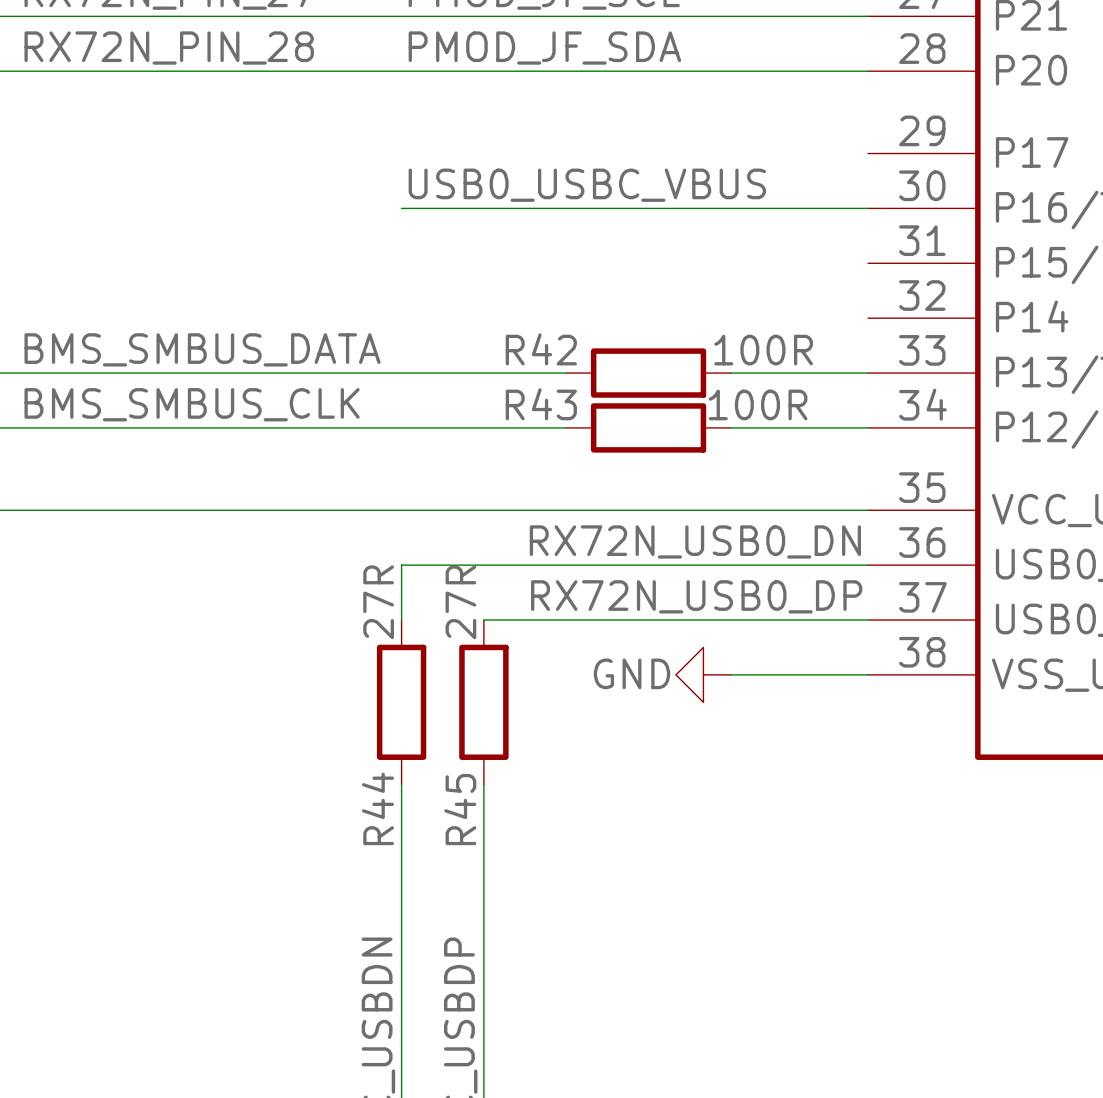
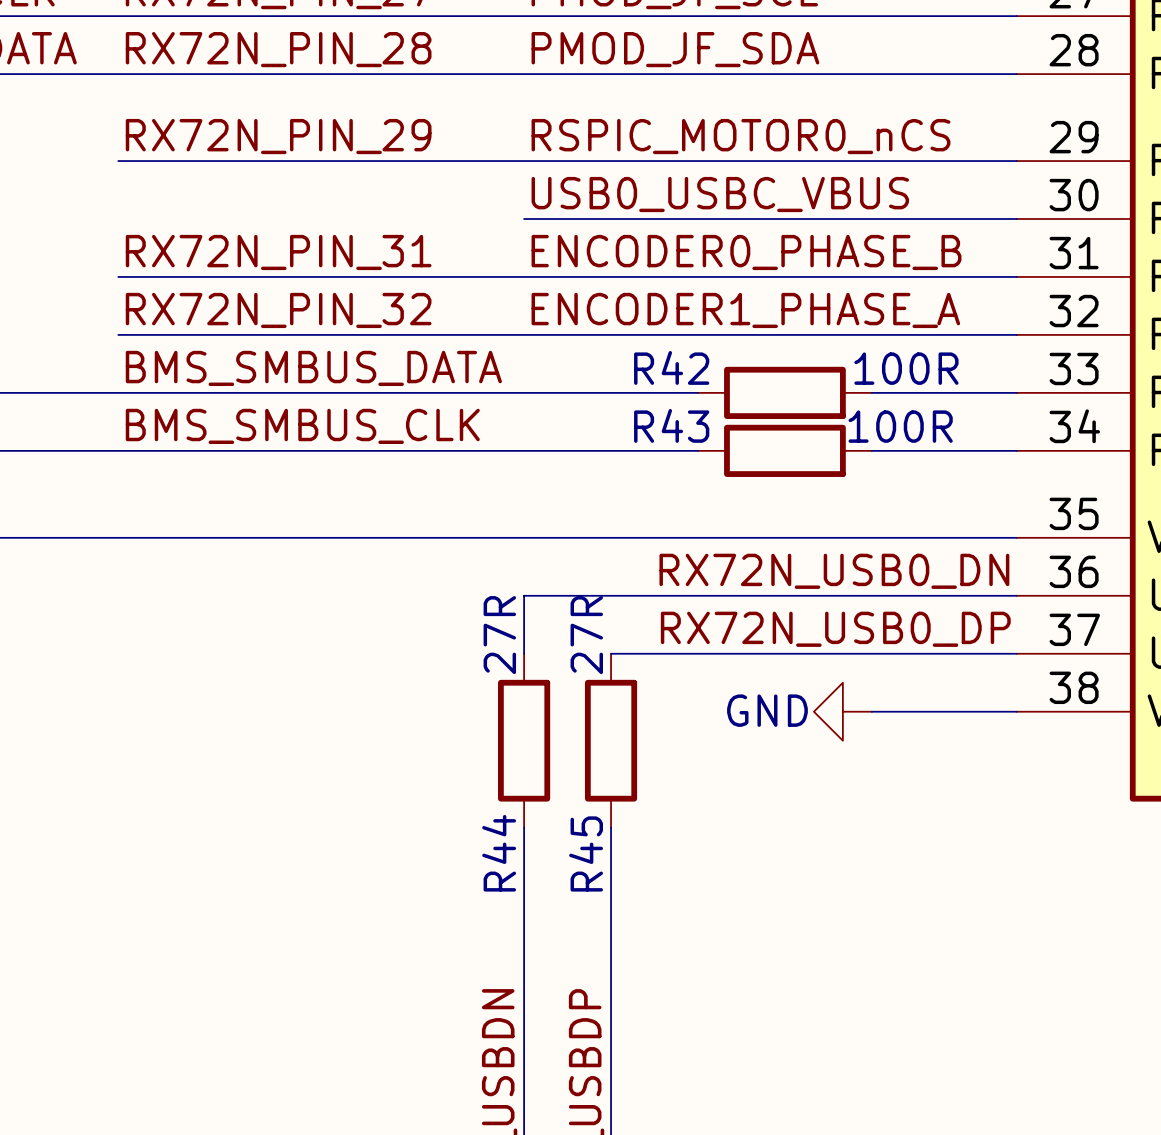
label: none -> RX72N_PIN_29 (278, 136)
label: none -> RSPIC_MOTOR0_nCS (740, 136)
wire: none -> (118, 161) (1016, 161)
label: none -> RX72N_PIN_31 (278, 252)
label: none -> ENCODER0_PHASE_B (746, 252)
wire: none -> (118, 276) (1016, 276)
label: none -> RX72N_PIN_32 (278, 310)
label: none -> ENCODER1_PHASE_A (745, 310)
wire: none -> (118, 334) (1016, 334)

